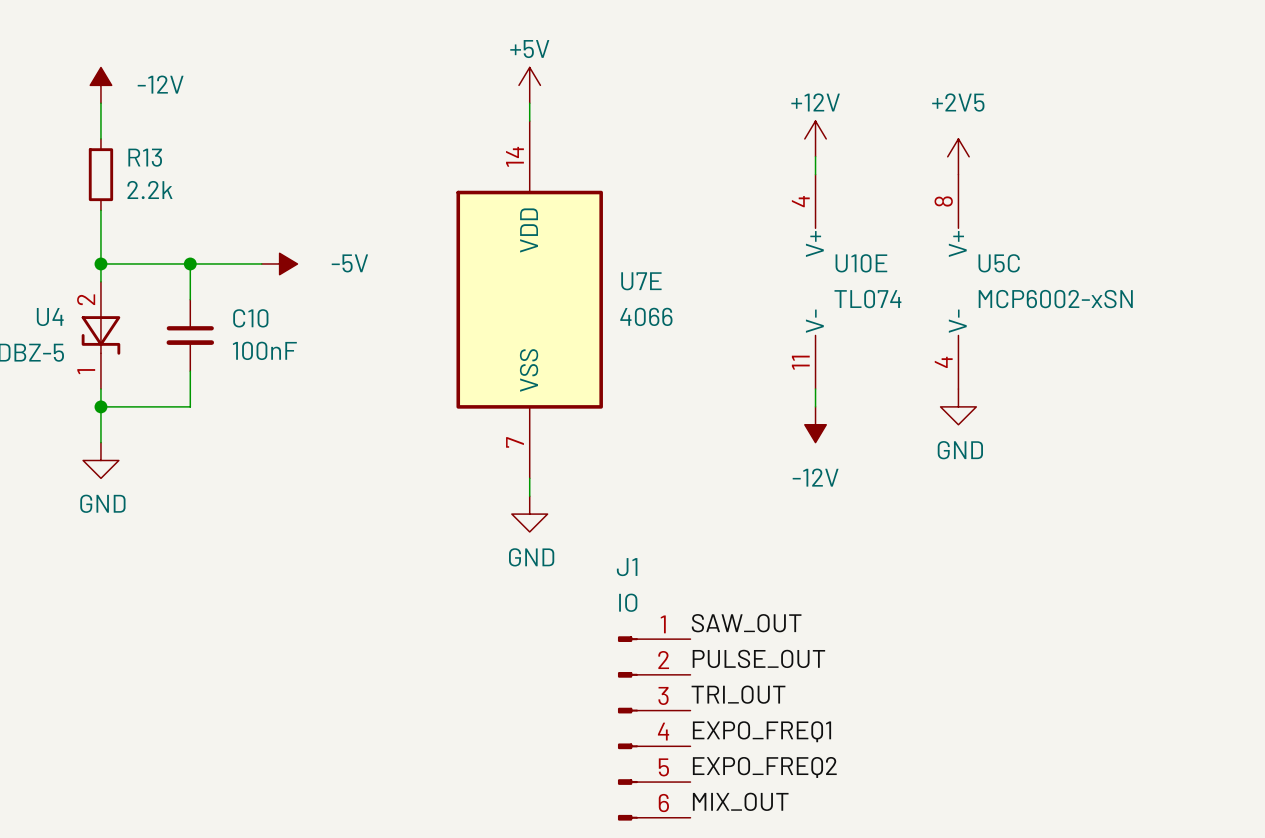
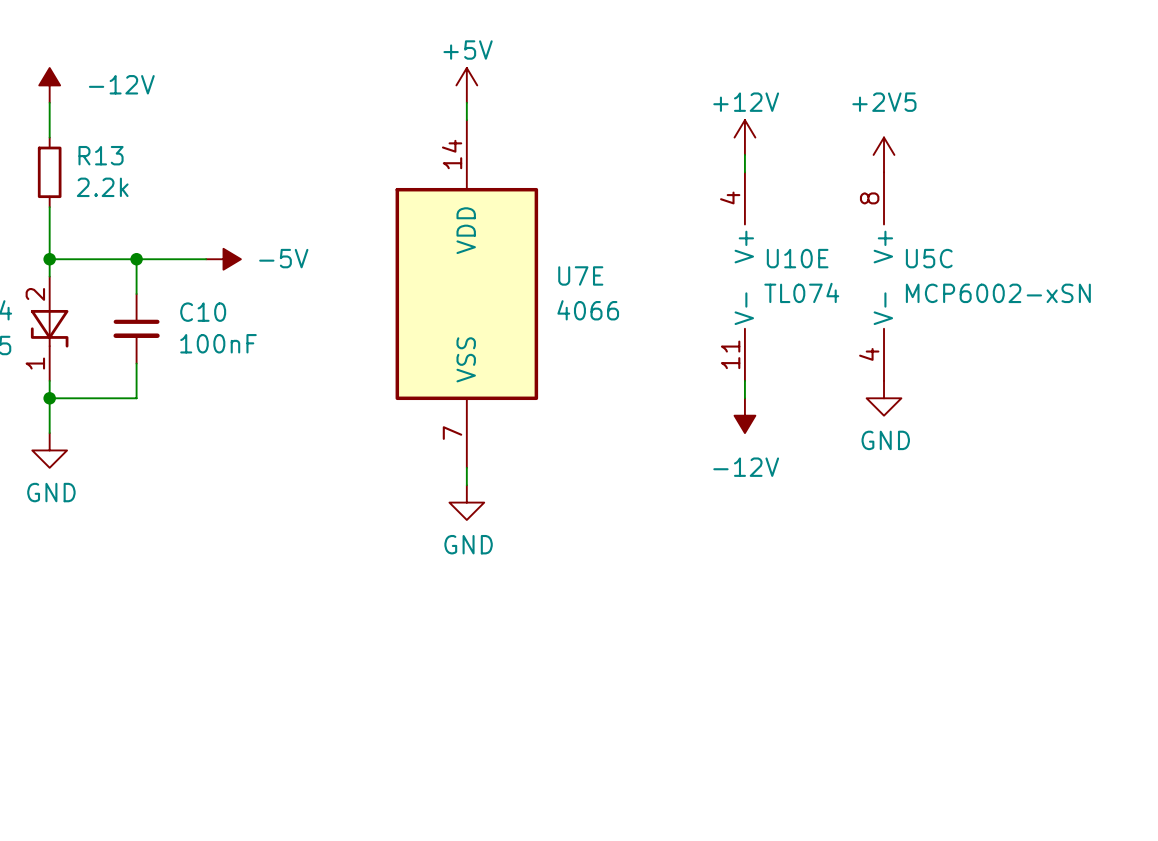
label: SAW_OUT (746, 623) -> none
label: PULSE_OUT (758, 658) -> none
label: TRI_OUT (738, 694) -> none
J1: IO (654, 728) -> none
label: EXPO_FREQ1 (761, 731) -> none
label: EXPO_FREQ2 (764, 767) -> none
label: MIX_OUT (740, 801) -> none

